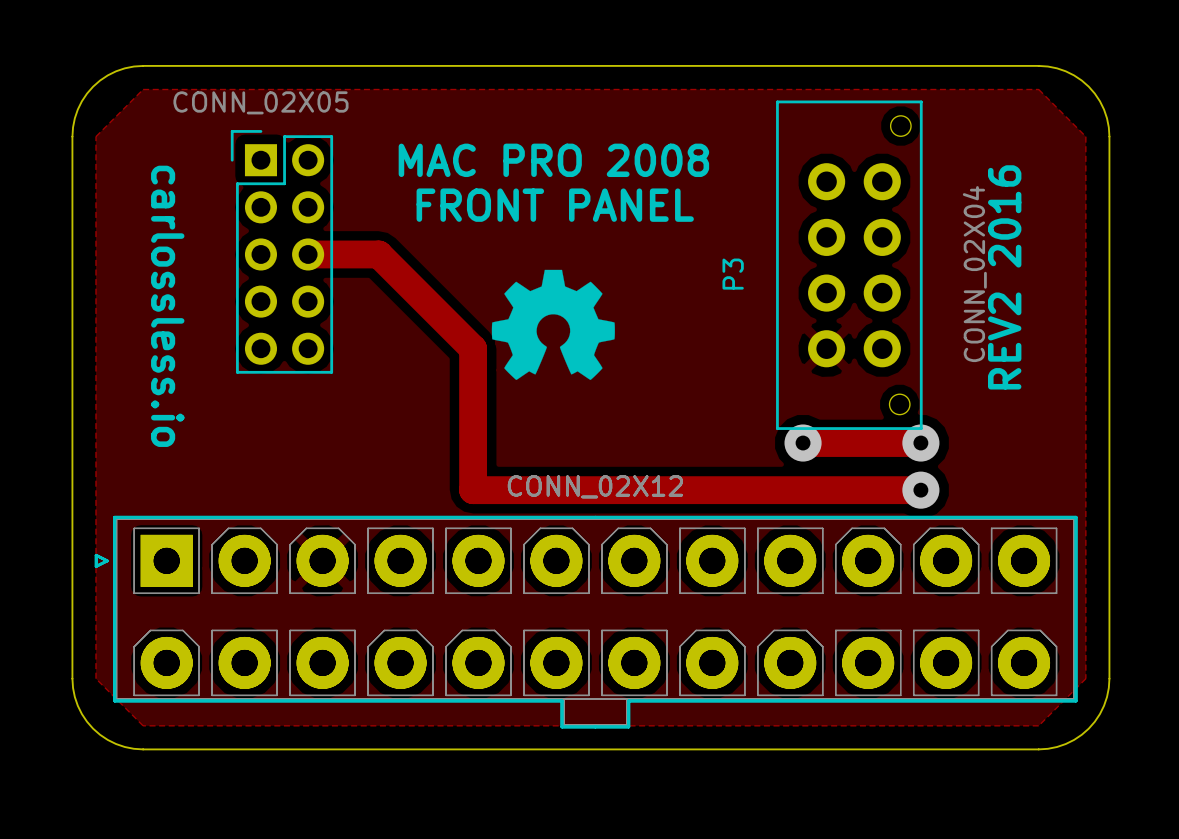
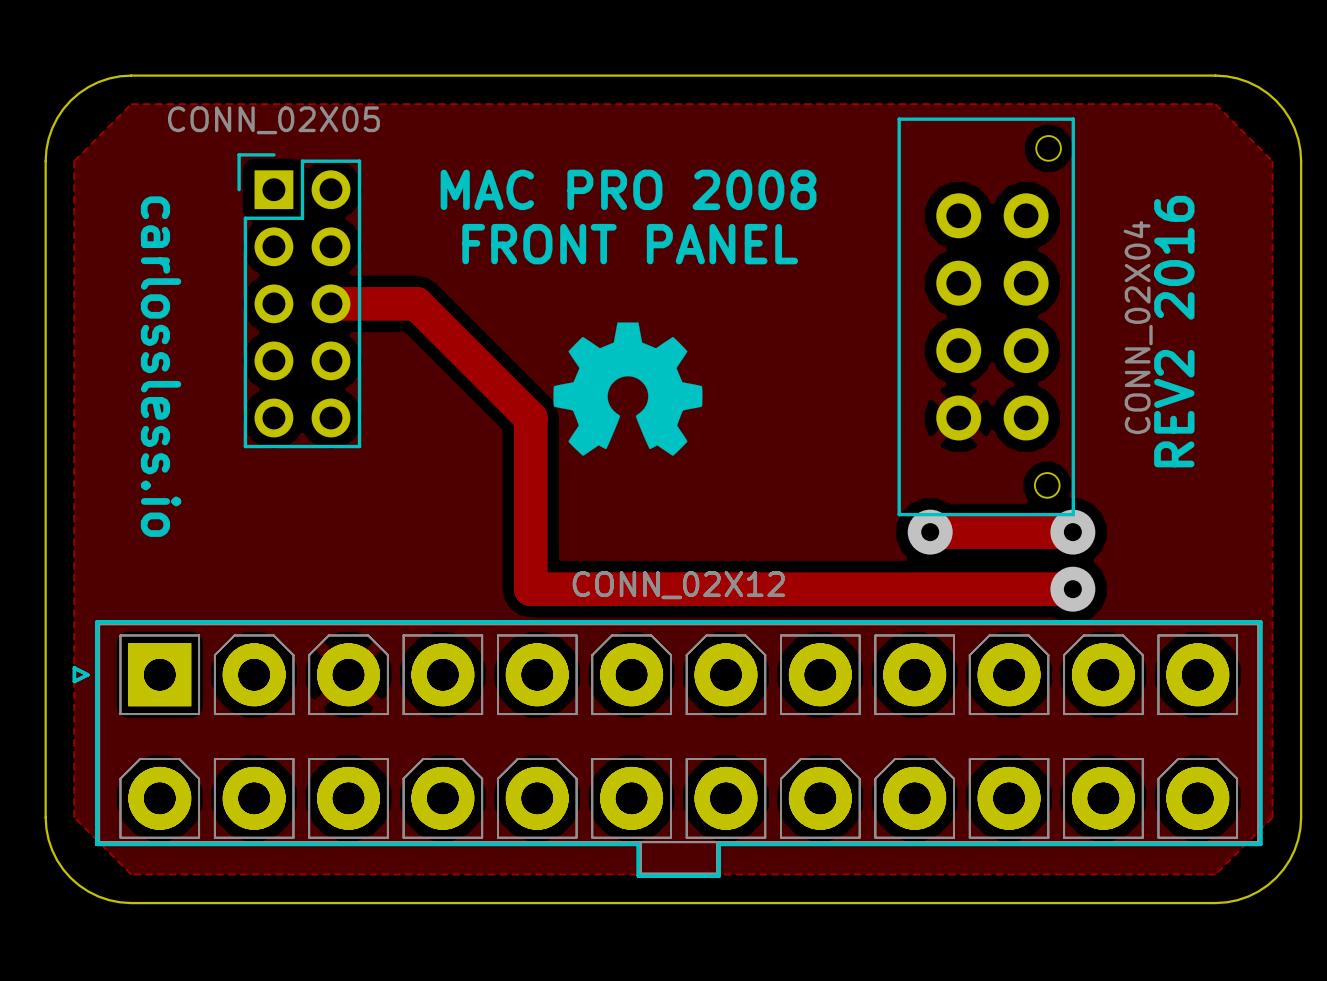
P3 name: P3 (733, 274) -> none

